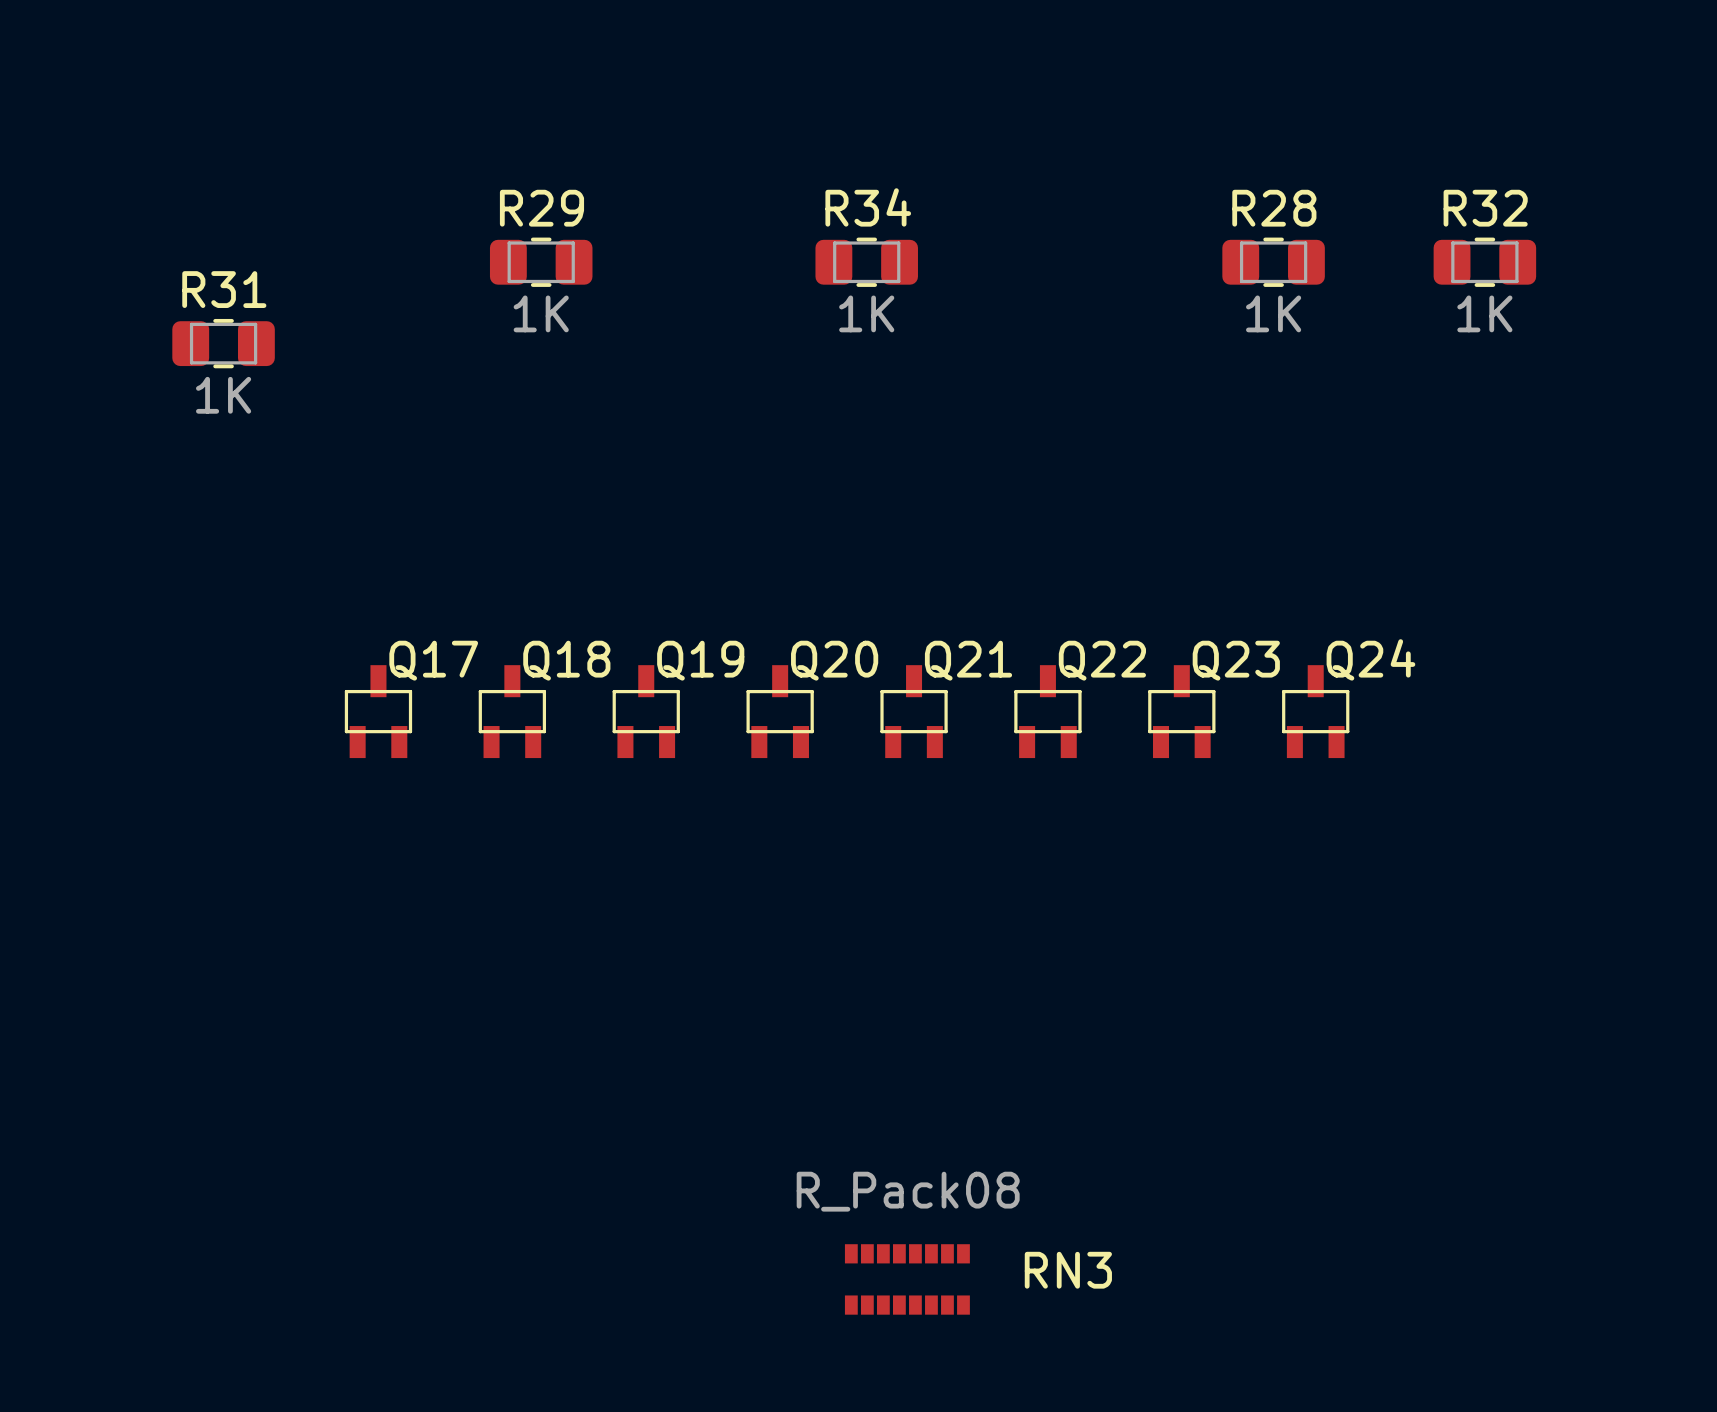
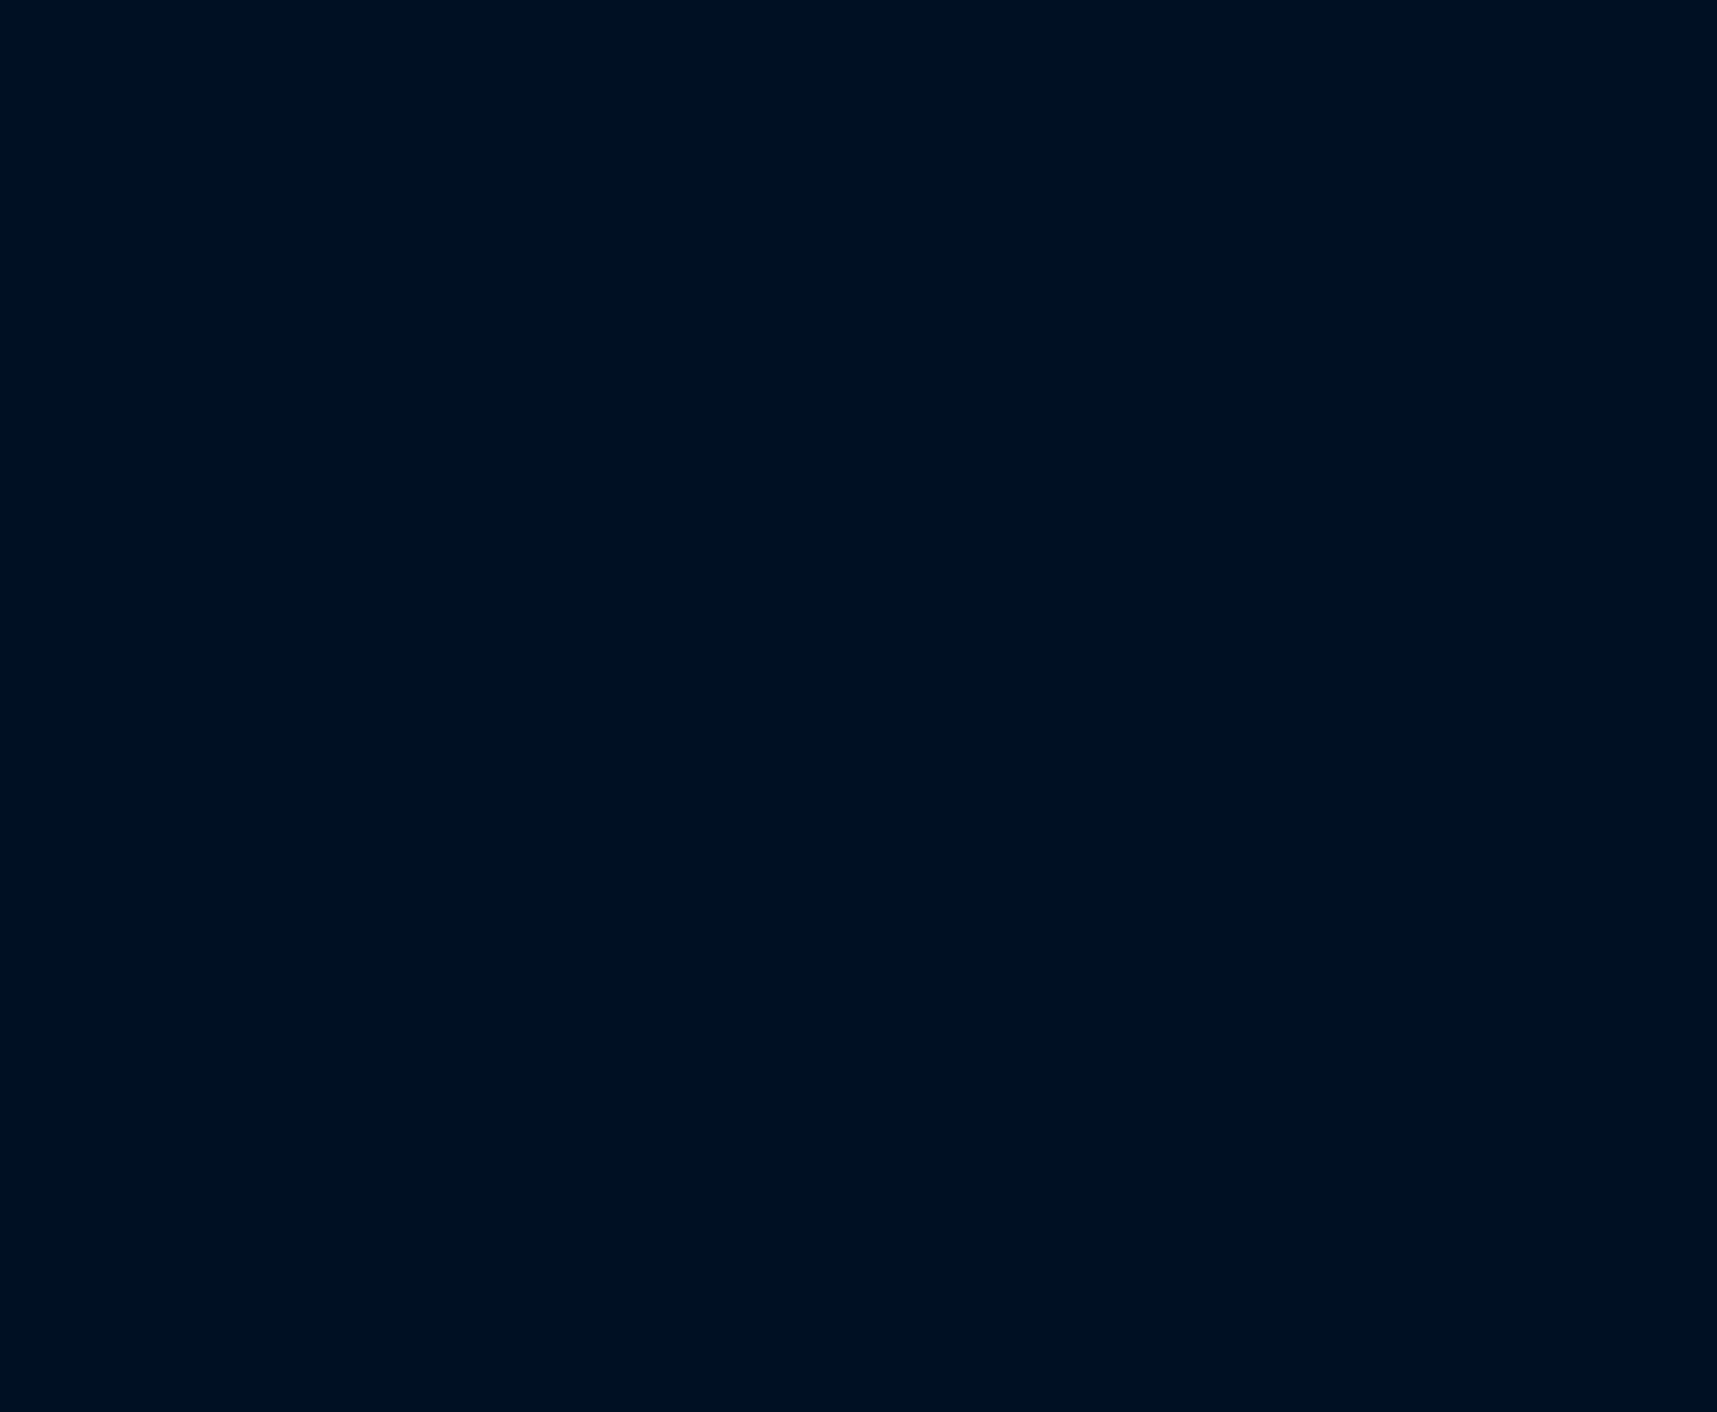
R29: 1K (541, 262) -> none
R34: 1K (866, 262) -> none
R28: 1K (1273, 262) -> none
R32: 1K (1484, 262) -> none
R31: 1K (223, 343) -> none
Q17: (378, 711) -> none
Q18: (512, 711) -> none
Q19: (646, 711) -> none
Q20: (780, 711) -> none
Q21: (914, 711) -> none
Q22: (1047, 711) -> none
Q23: (1181, 711) -> none
Q24: (1315, 711) -> none
RN3: R_Pack08 (907, 1279) -> none

